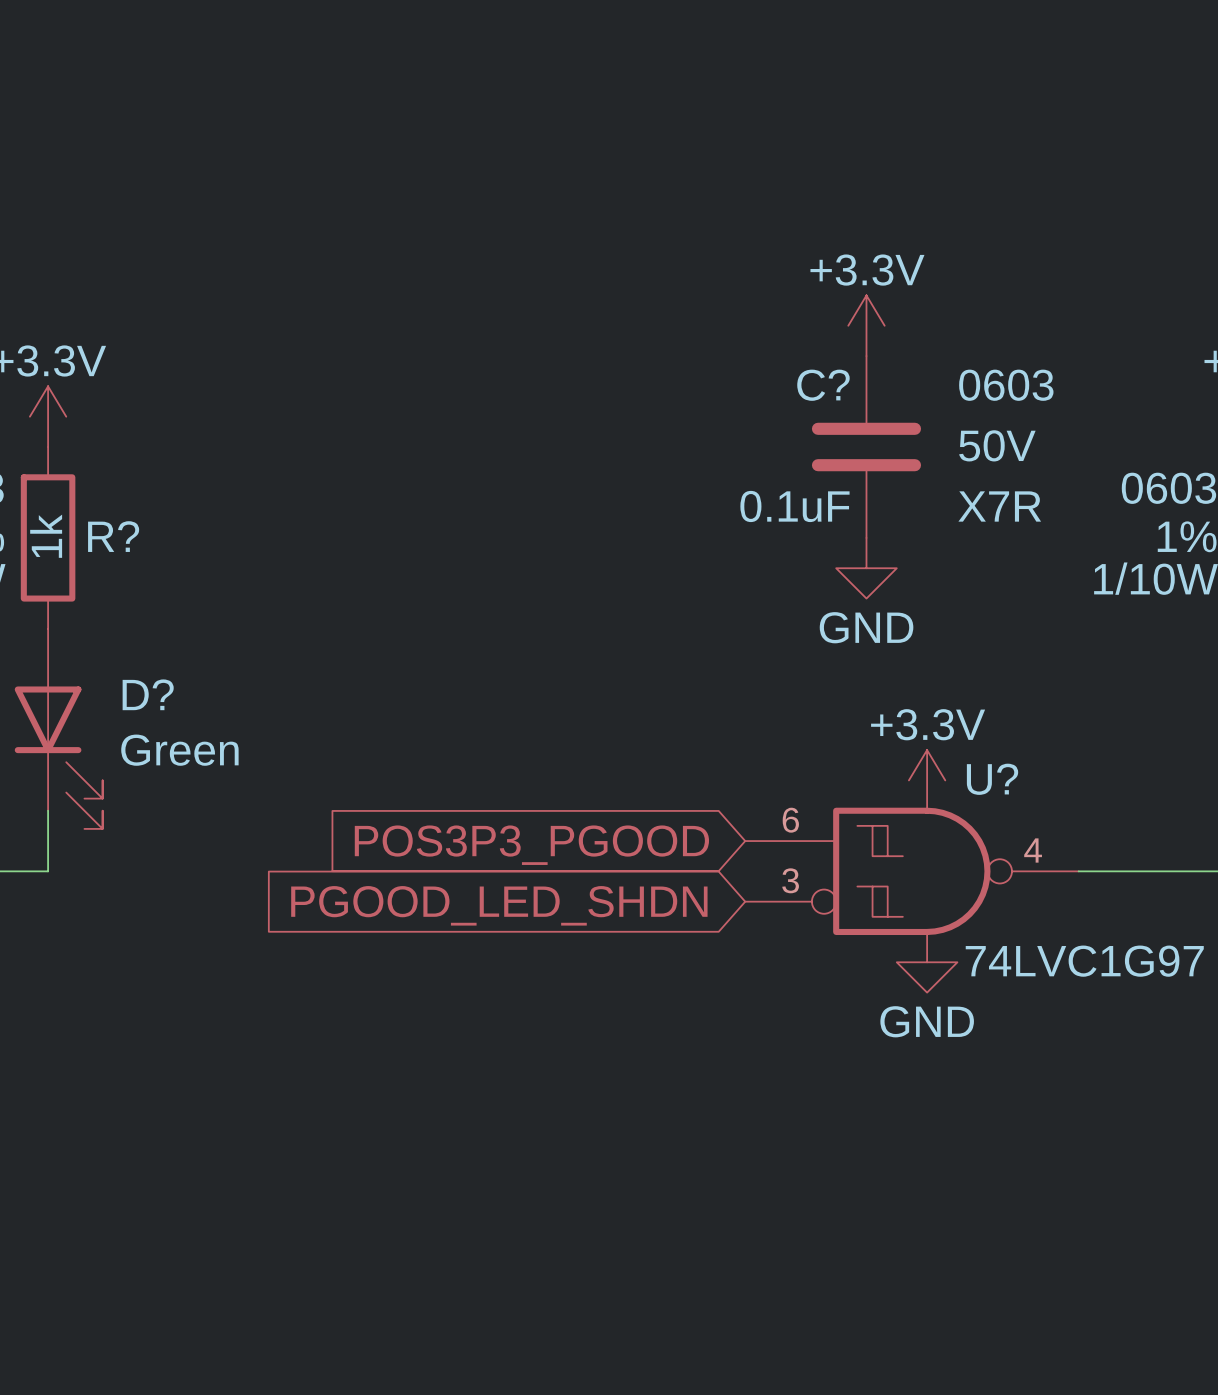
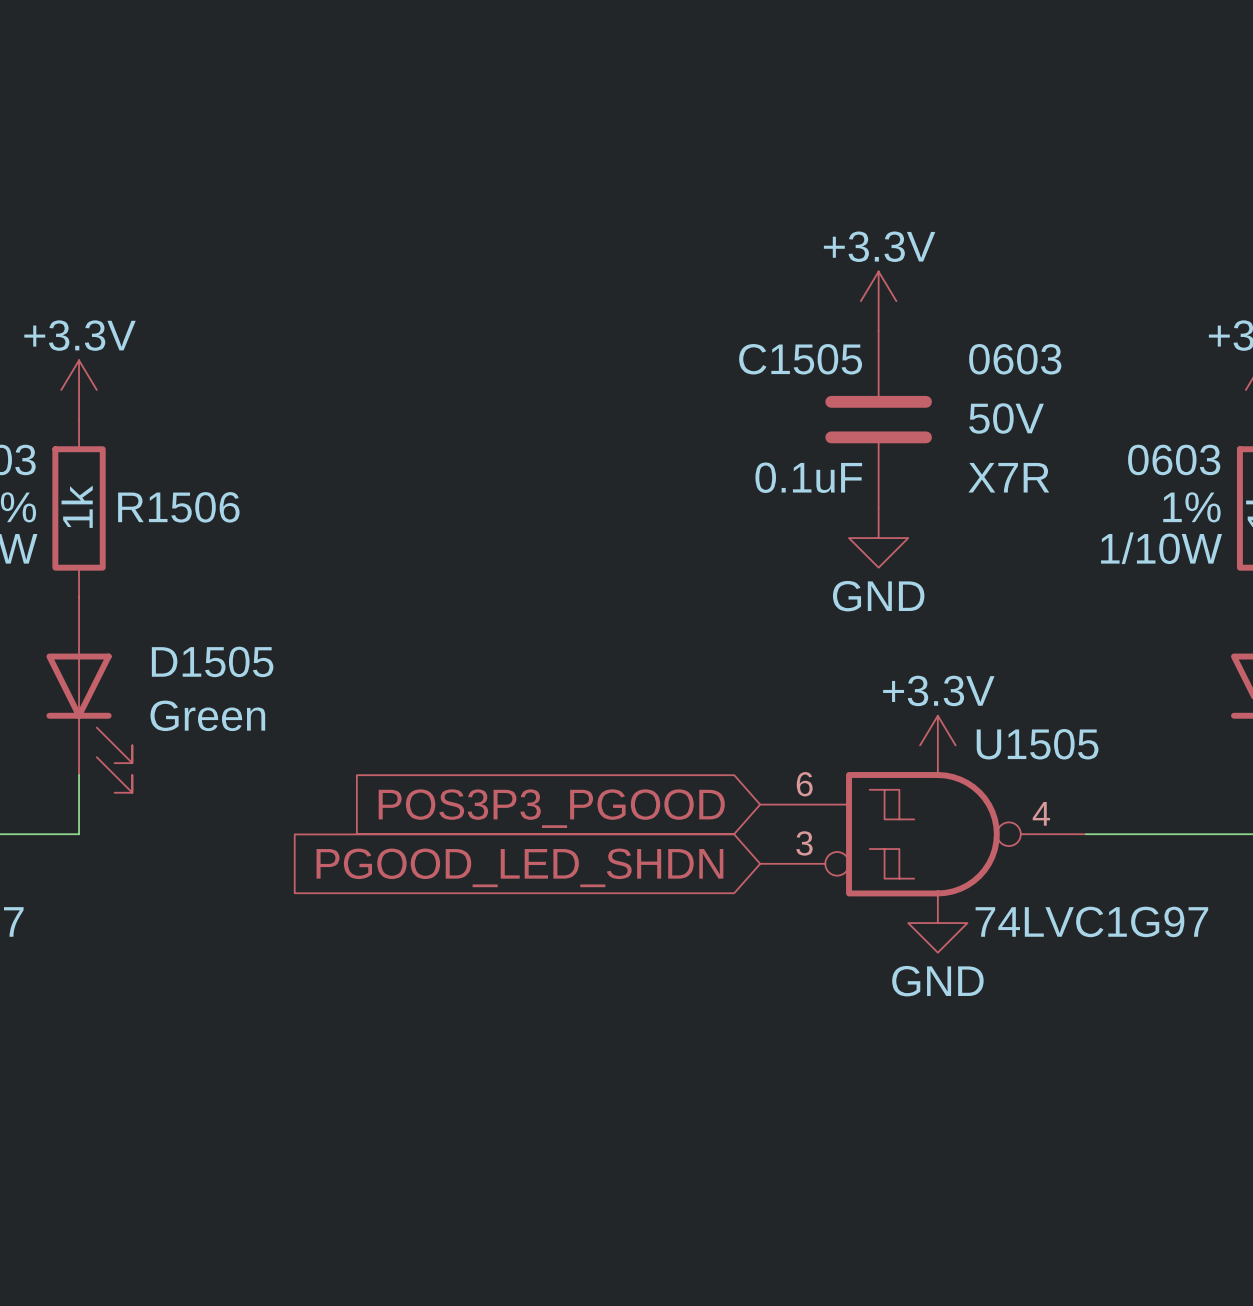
C? name: C? (823, 385) -> C1505 (800, 359)
R? name: R? (113, 536) -> R1506 (178, 507)
D? name: D? (148, 694) -> D1505 (212, 661)
U? name: U? (992, 779) -> U1505 (1037, 744)

